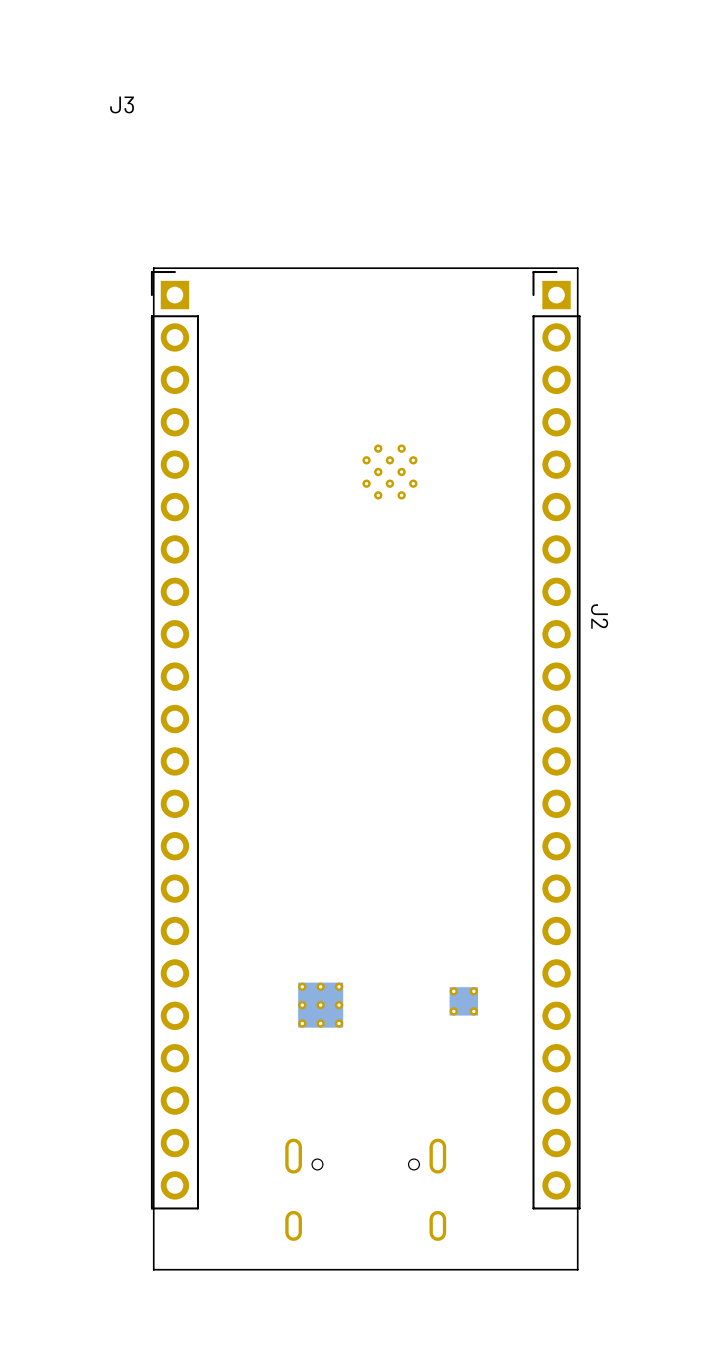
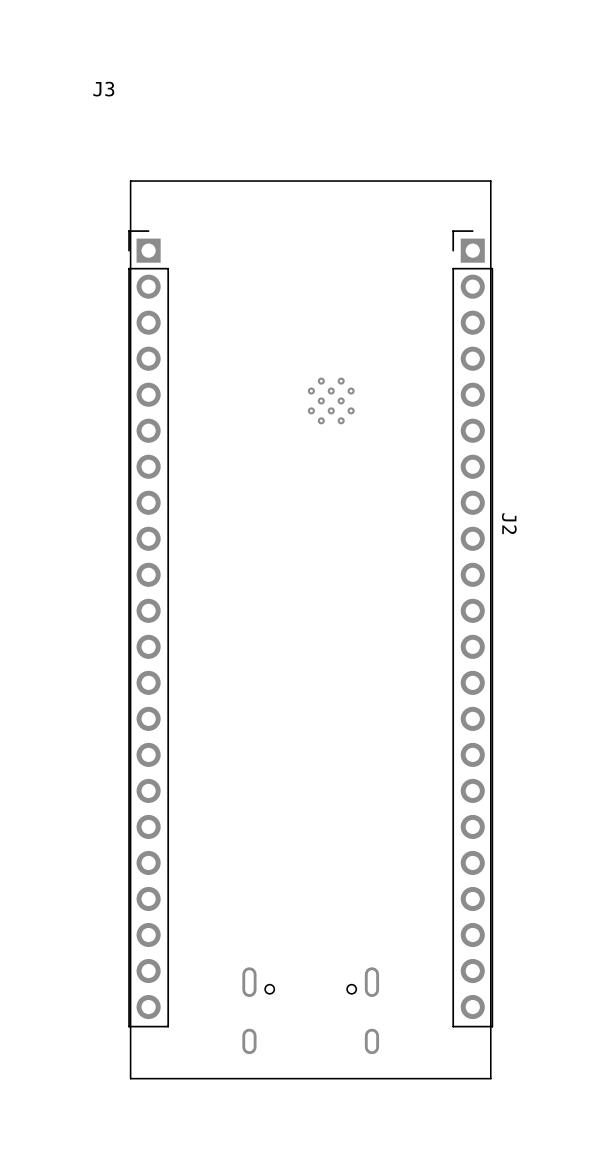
board edge: (577, 268) (153, 268) -> (490, 227) (490, 181) (130, 181) (130, 227)
part: (463, 1001) -> none
part: (320, 1005) -> none

